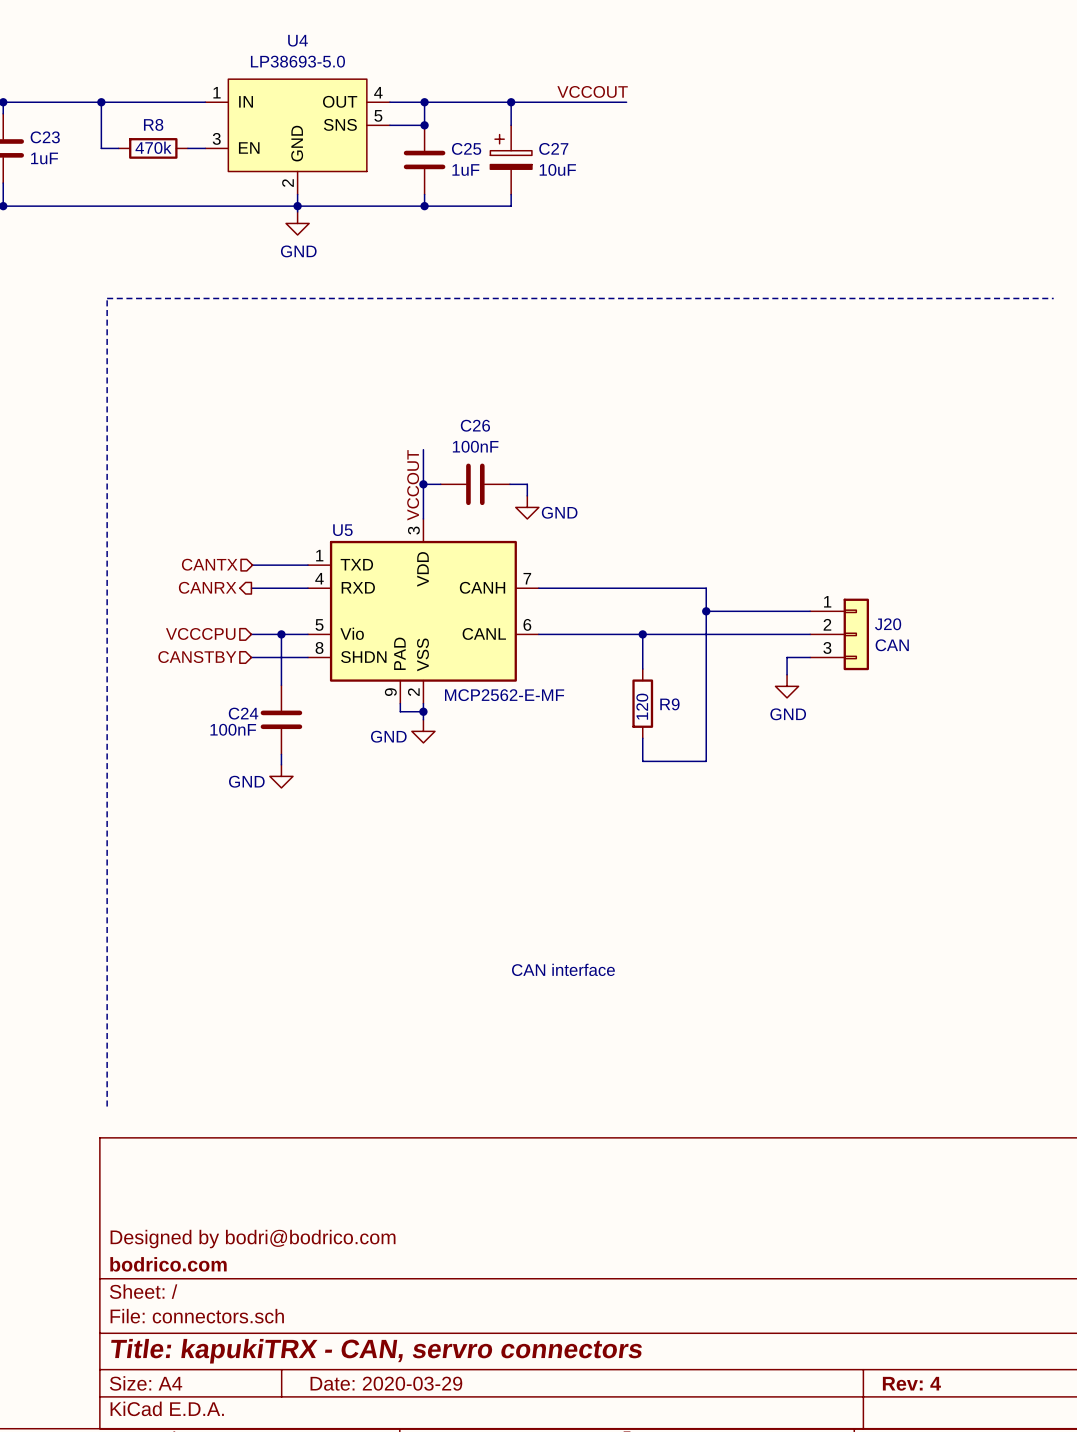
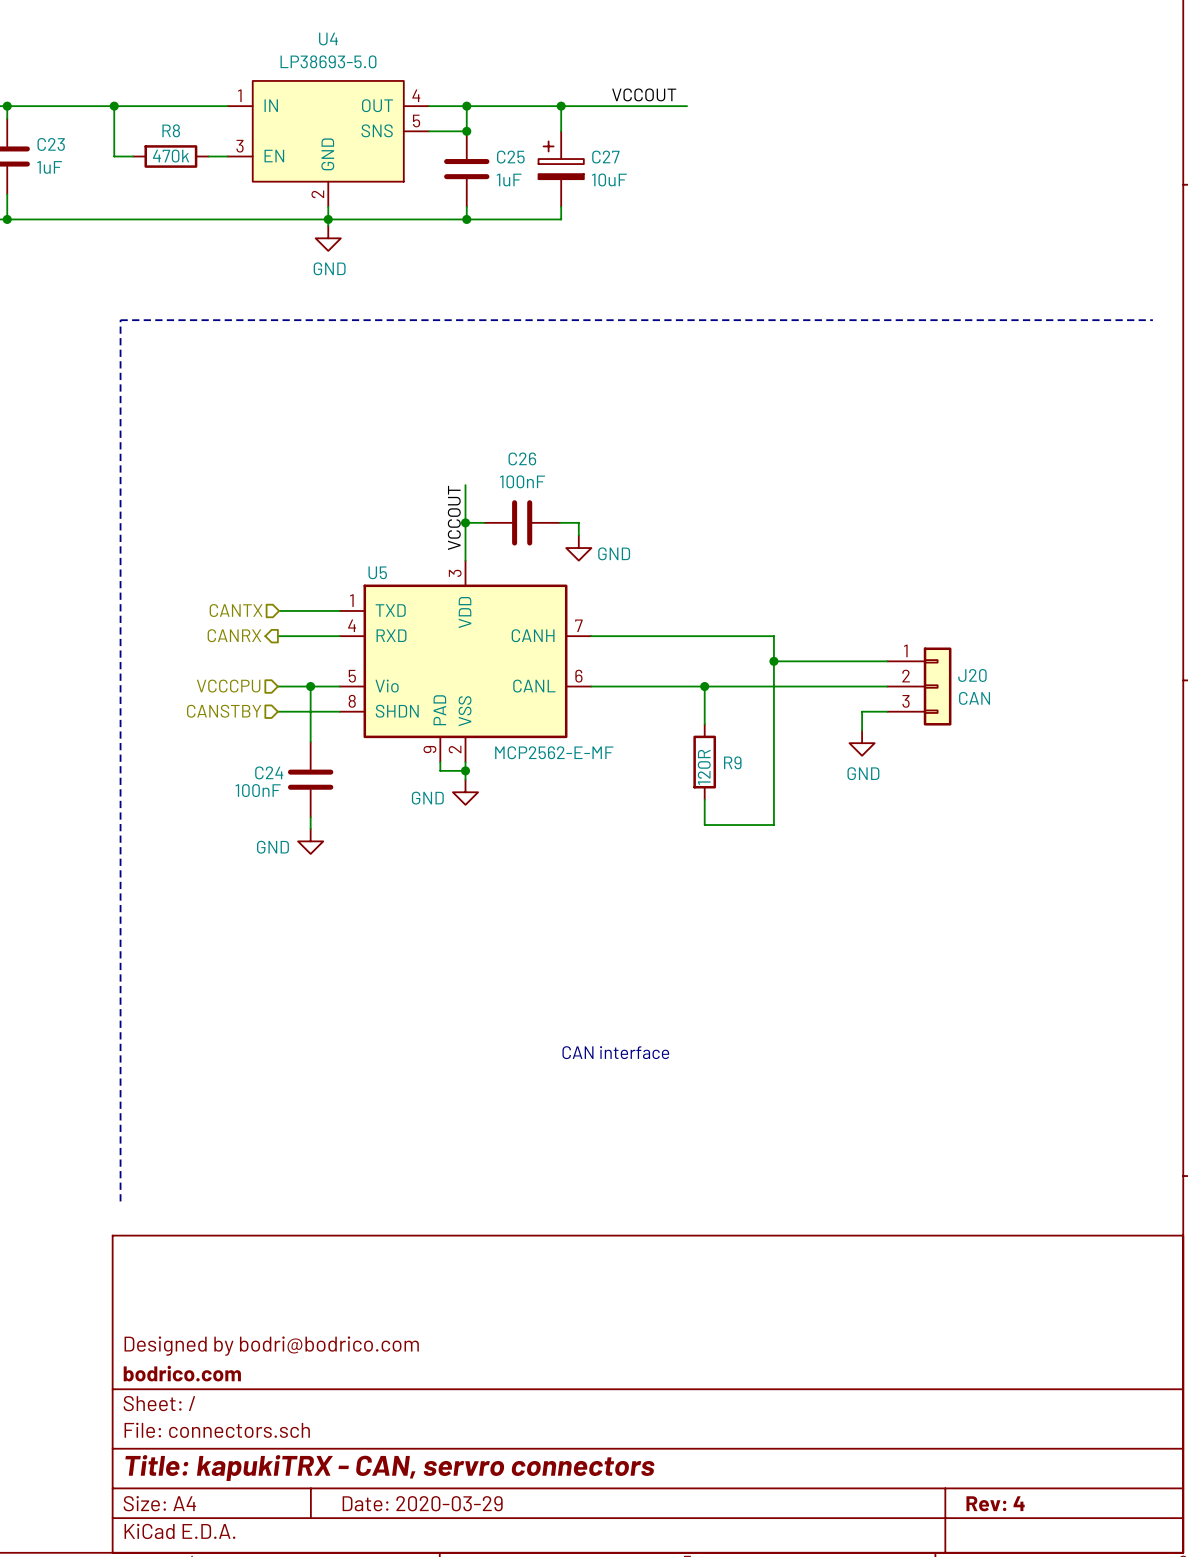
R9 value: 120 (642, 706) -> 120R (704, 767)

